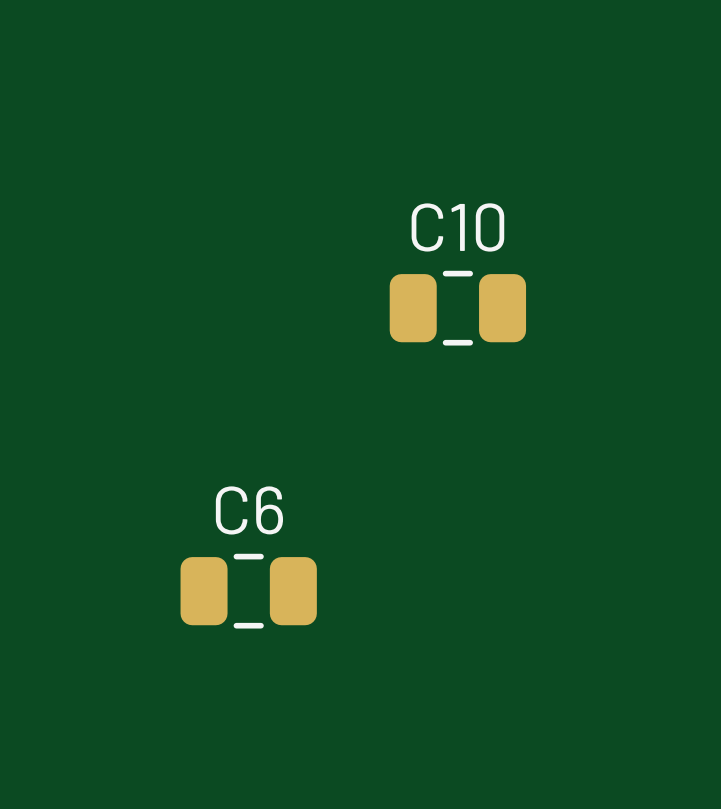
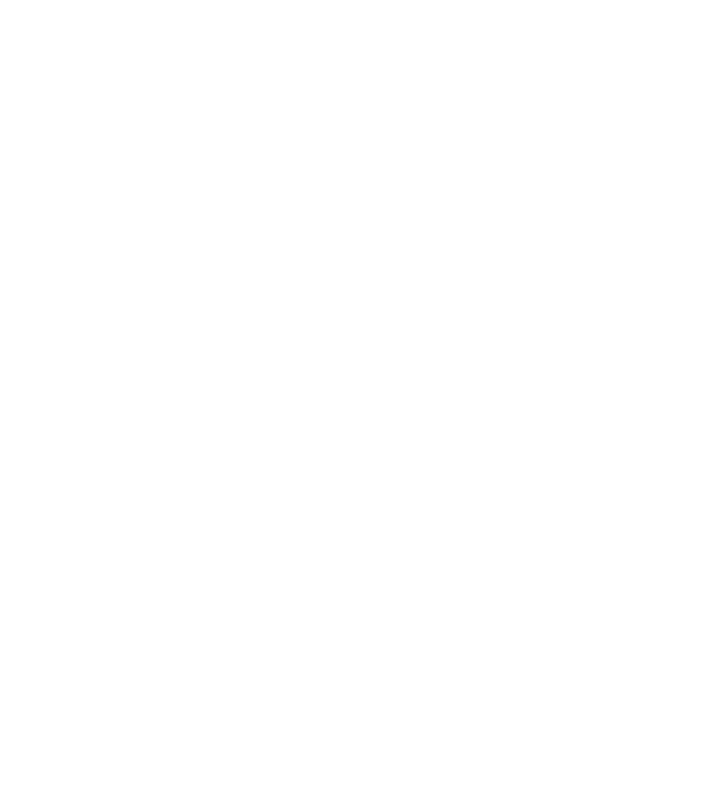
C10: (457, 308) -> none
C6: (248, 591) -> none

